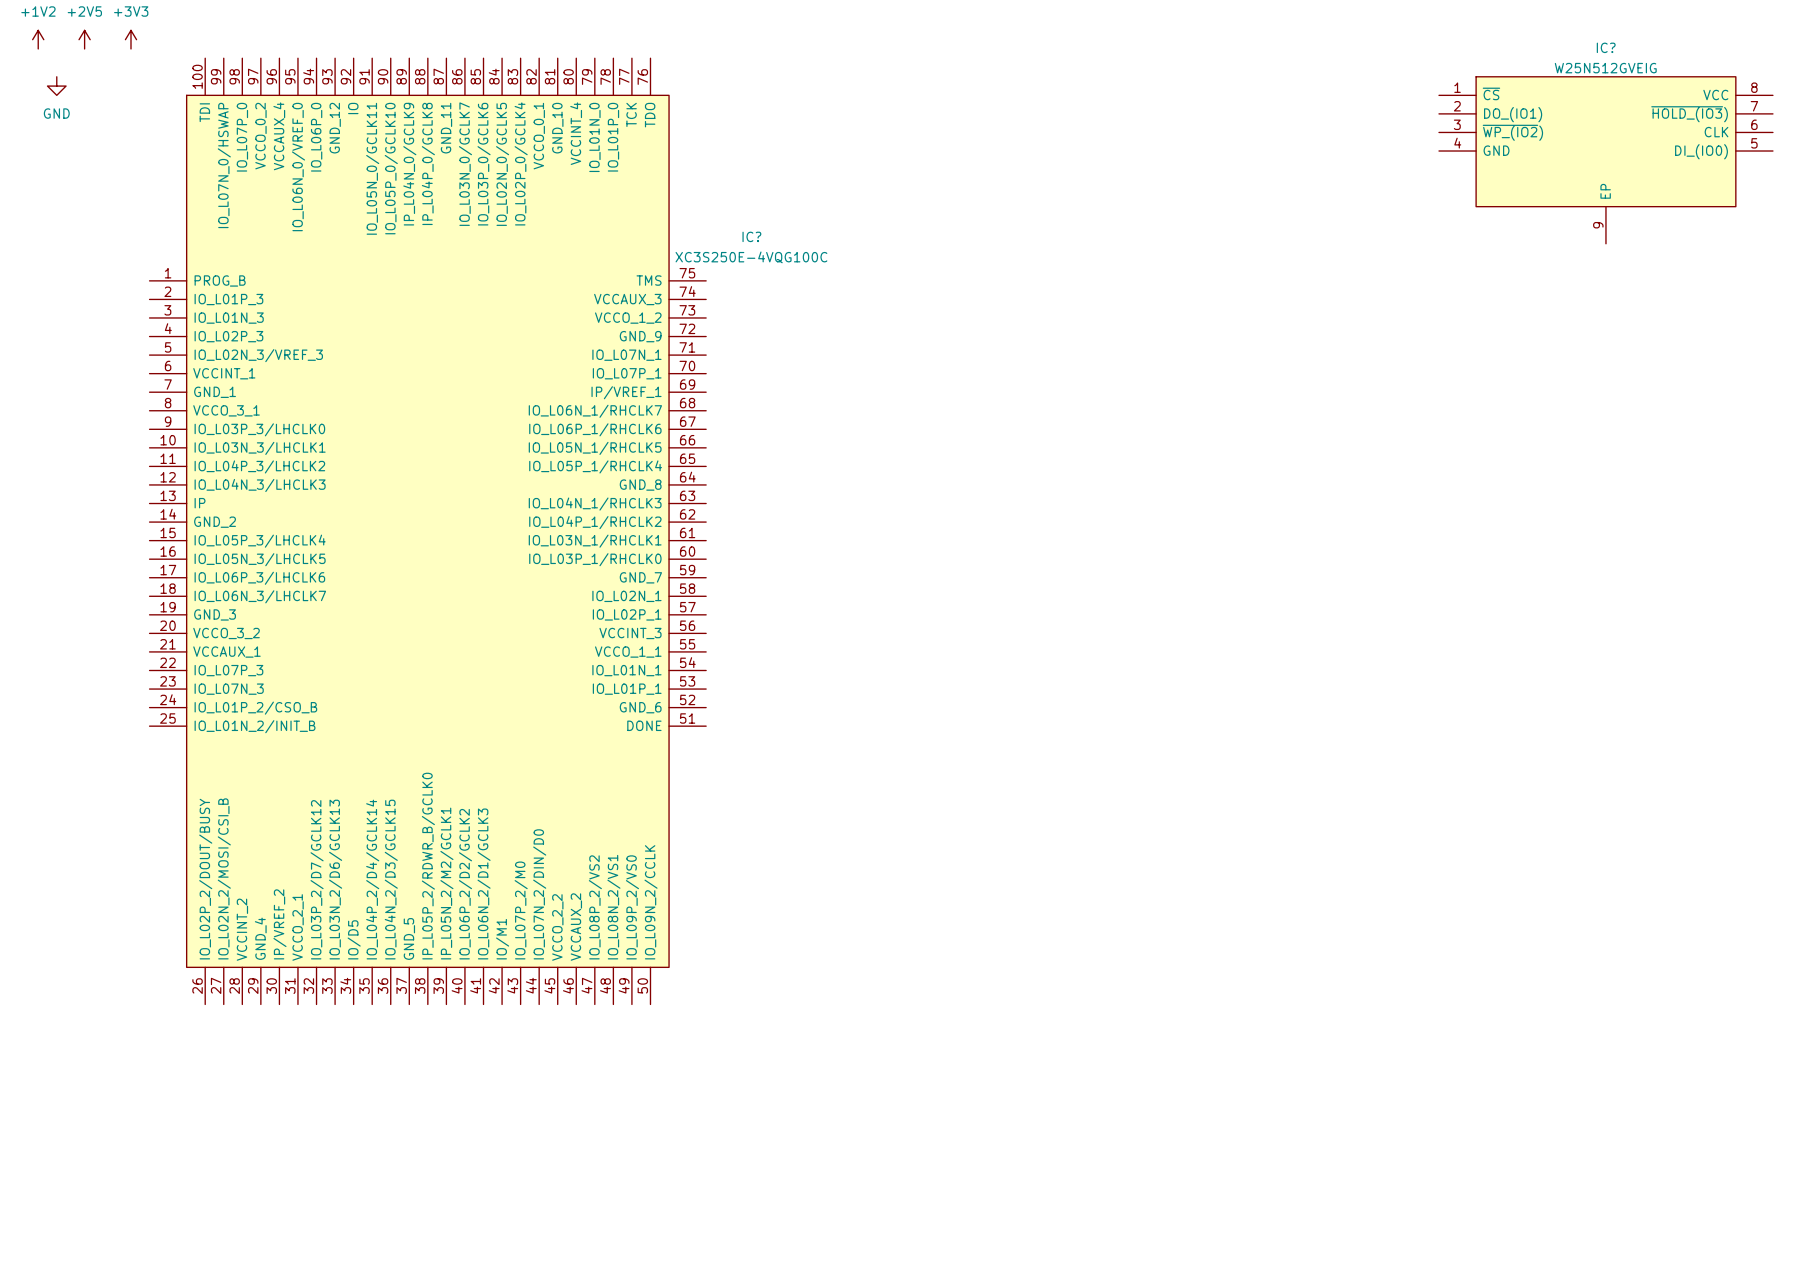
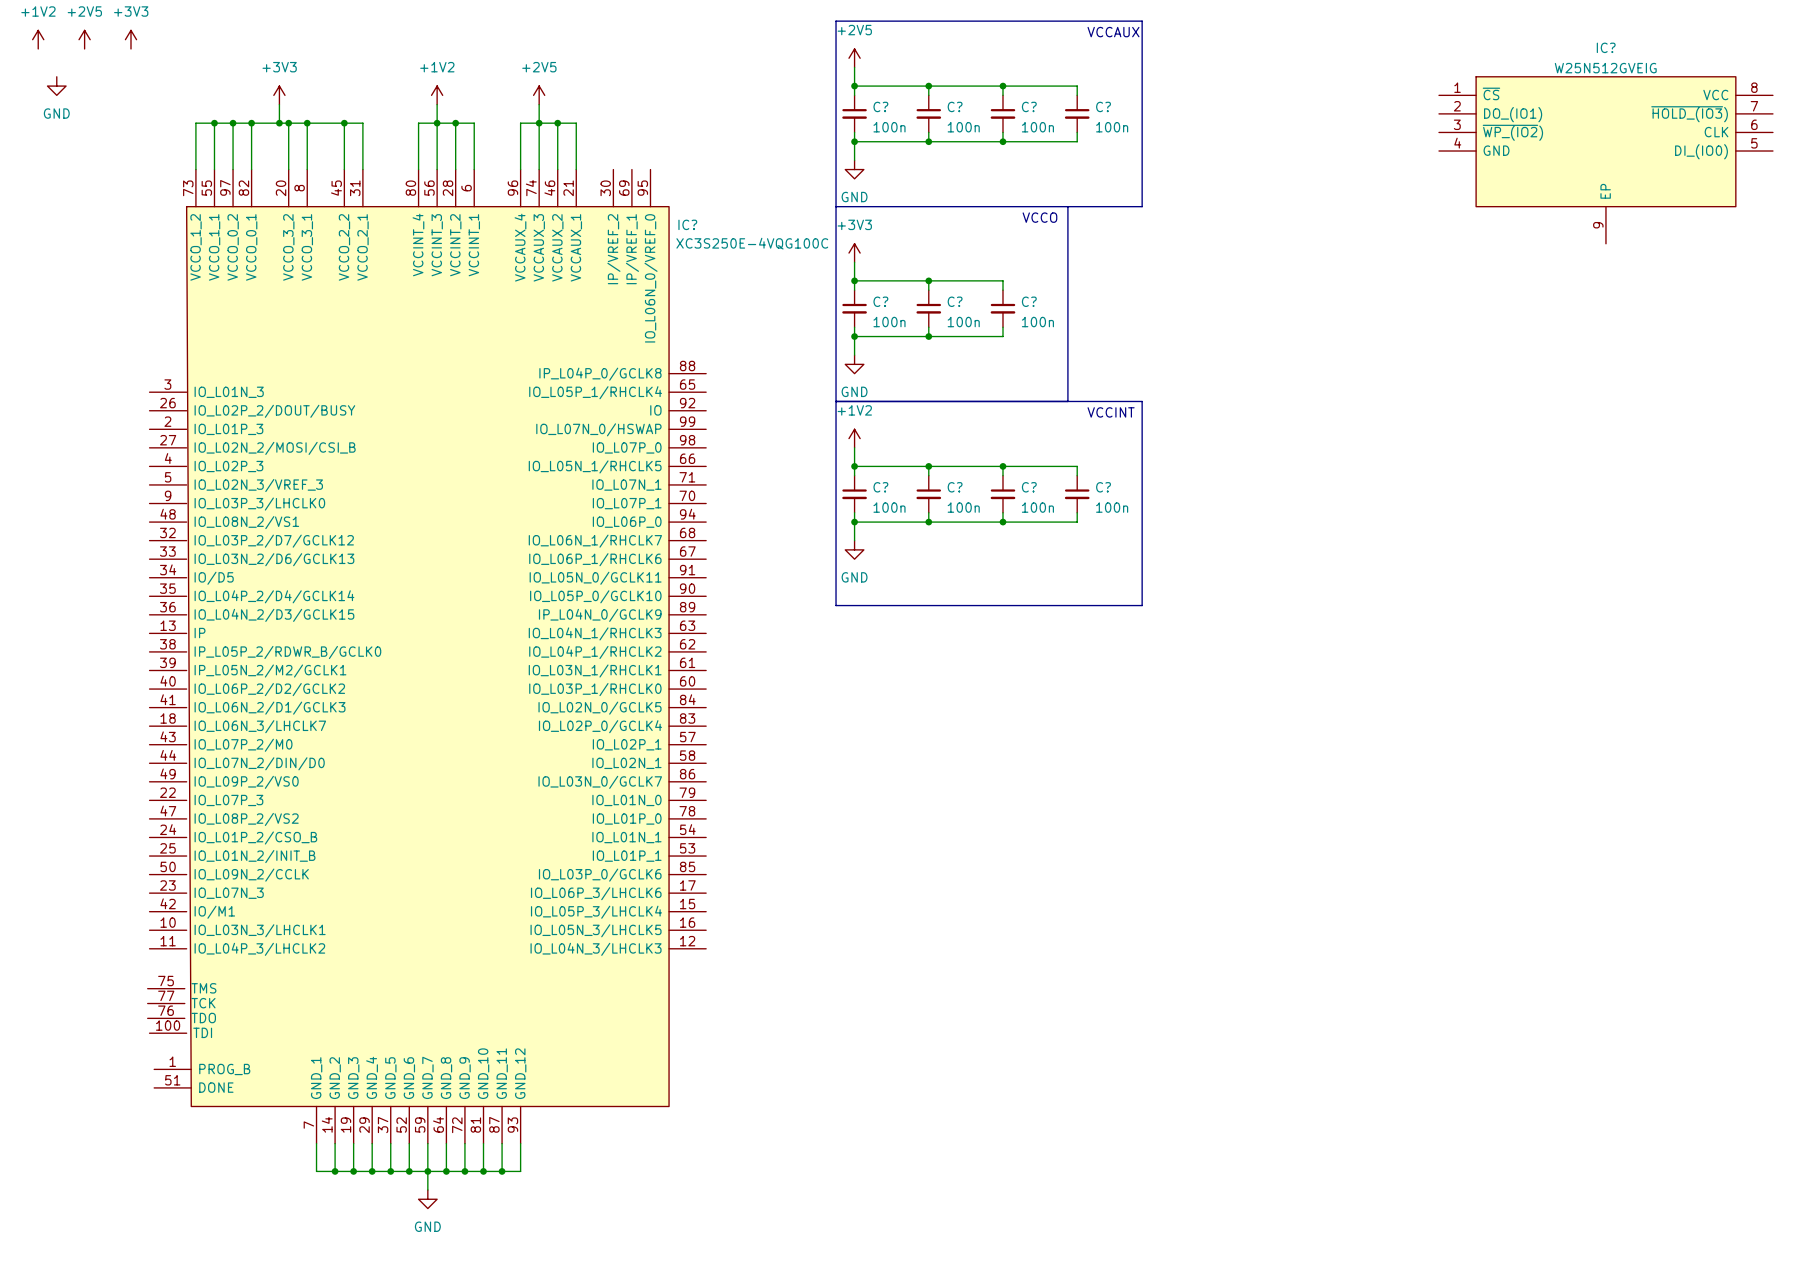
text: none -> VCCAUX (1113, 32)
power symbol: none -> +2V5 (854, 58)
wire: none -> (854, 67) (854, 95)
wire: none -> (854, 86) (1077, 86) (1077, 95)
junction: none -> (854, 86)
wire: none -> (928, 86) (928, 95)
junction: none -> (928, 86)
wire: none -> (1002, 86) (1002, 95)
junction: none -> (1002, 86)
power symbol: none -> +3V3 (279, 95)
power symbol: none -> +1V2 (437, 95)
power symbol: none -> +2V5 (539, 95)
C?: none -> 100n (854, 113)
C?: none -> 100n (928, 113)
C?: none -> 100n (1002, 113)
C?: none -> 100n (1077, 113)
junction: none -> (214, 123)
junction: none -> (233, 123)
junction: none -> (251, 123)
junction: none -> (279, 123)
junction: none -> (288, 123)
junction: none -> (307, 123)
junction: none -> (344, 123)
junction: none -> (437, 123)
junction: none -> (455, 123)
junction: none -> (539, 123)
junction: none -> (557, 123)
wire: none -> (854, 132) (854, 160)
wire: none -> (928, 132) (928, 141)
wire: none -> (1002, 132) (1002, 141)
wire: none -> (1077, 132) (1077, 141) (854, 141)
junction: none -> (854, 141)
junction: none -> (928, 141)
junction: none -> (1002, 141)
power symbol: none -> GND (854, 169)
line: none -> (836, 206) (1142, 206) (1142, 21) (836, 21) (836, 605) (1142, 605) (1142, 401) (836, 401)
line: none -> (1067, 206) (1067, 401)
text: none -> VCCO (1039, 217)
power symbol: none -> +3V3 (854, 253)
wire: none -> (854, 262) (854, 290)
wire: none -> (854, 280) (1002, 280) (1002, 290)
junction: none -> (854, 280)
wire: none -> (928, 280) (928, 290)
junction: none -> (928, 280)
C?: none -> 100n (854, 308)
C?: none -> 100n (928, 308)
C?: none -> 100n (1002, 308)
wire: none -> (854, 327) (854, 355)
wire: none -> (928, 327) (928, 336)
wire: none -> (1002, 327) (1002, 336) (854, 336)
junction: none -> (854, 336)
junction: none -> (928, 336)
power symbol: none -> GND (854, 364)
text: none -> VCCINT (1111, 412)
power symbol: none -> +1V2 (854, 438)
wire: none -> (854, 447) (854, 475)
wire: none -> (854, 466) (1077, 466) (1077, 475)
junction: none -> (854, 466)
wire: none -> (928, 466) (928, 475)
junction: none -> (928, 466)
wire: none -> (1002, 466) (1002, 475)
junction: none -> (1002, 466)
C?: none -> 100n (854, 494)
C?: none -> 100n (928, 494)
C?: none -> 100n (1002, 494)
C?: none -> 100n (1077, 494)
wire: none -> (854, 512) (854, 540)
wire: none -> (928, 512) (928, 522)
wire: none -> (1002, 512) (1002, 522)
wire: none -> (1077, 512) (1077, 522) (854, 522)
junction: none -> (854, 522)
junction: none -> (928, 522)
junction: none -> (1002, 522)
IC?: XC3S250E-4VQG100C (427, 531) -> none
power symbol: none -> GND (854, 549)
IC?: none -> XC3S250E-4VQG100C (426, 656)
wire: none -> (316, 1143) (316, 1171) (520, 1171) (520, 1143)
wire: none -> (335, 1143) (335, 1171)
wire: none -> (353, 1143) (353, 1171)
wire: none -> (372, 1143) (372, 1171)
wire: none -> (390, 1143) (390, 1171)
wire: none -> (409, 1143) (409, 1171)
wire: none -> (427, 1143) (427, 1189)
wire: none -> (446, 1143) (446, 1171)
wire: none -> (464, 1143) (464, 1171)
wire: none -> (483, 1143) (483, 1171)
wire: none -> (502, 1143) (502, 1171)
junction: none -> (335, 1171)
junction: none -> (353, 1171)
junction: none -> (372, 1171)
junction: none -> (390, 1171)
junction: none -> (409, 1171)
junction: none -> (427, 1171)
junction: none -> (446, 1171)
junction: none -> (464, 1171)
junction: none -> (483, 1171)
junction: none -> (502, 1171)
power symbol: none -> GND (427, 1199)

